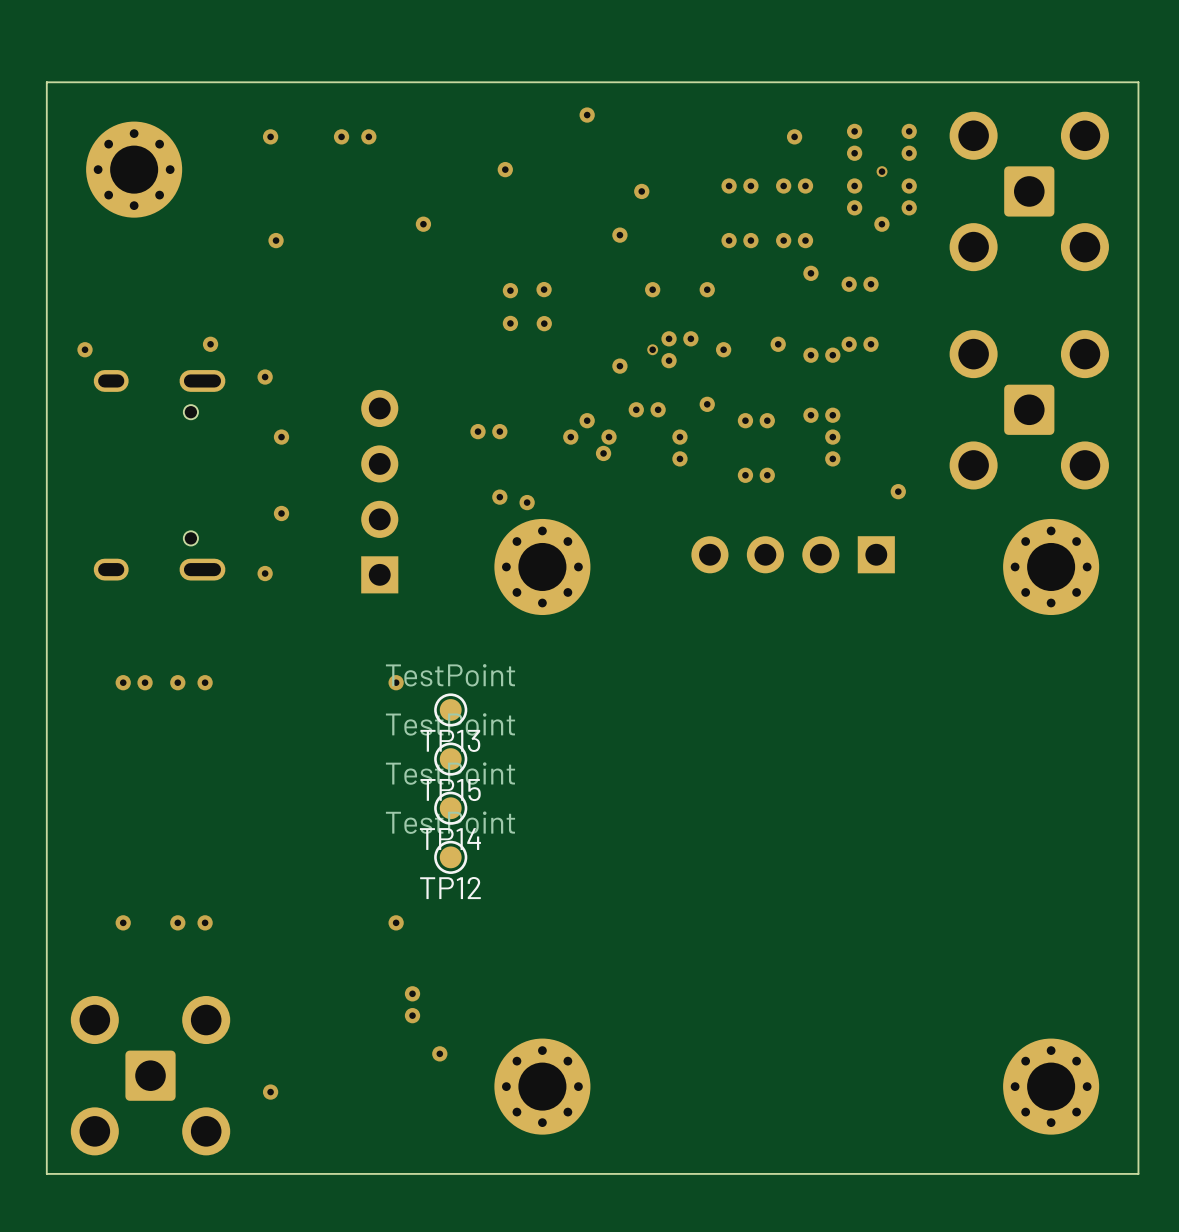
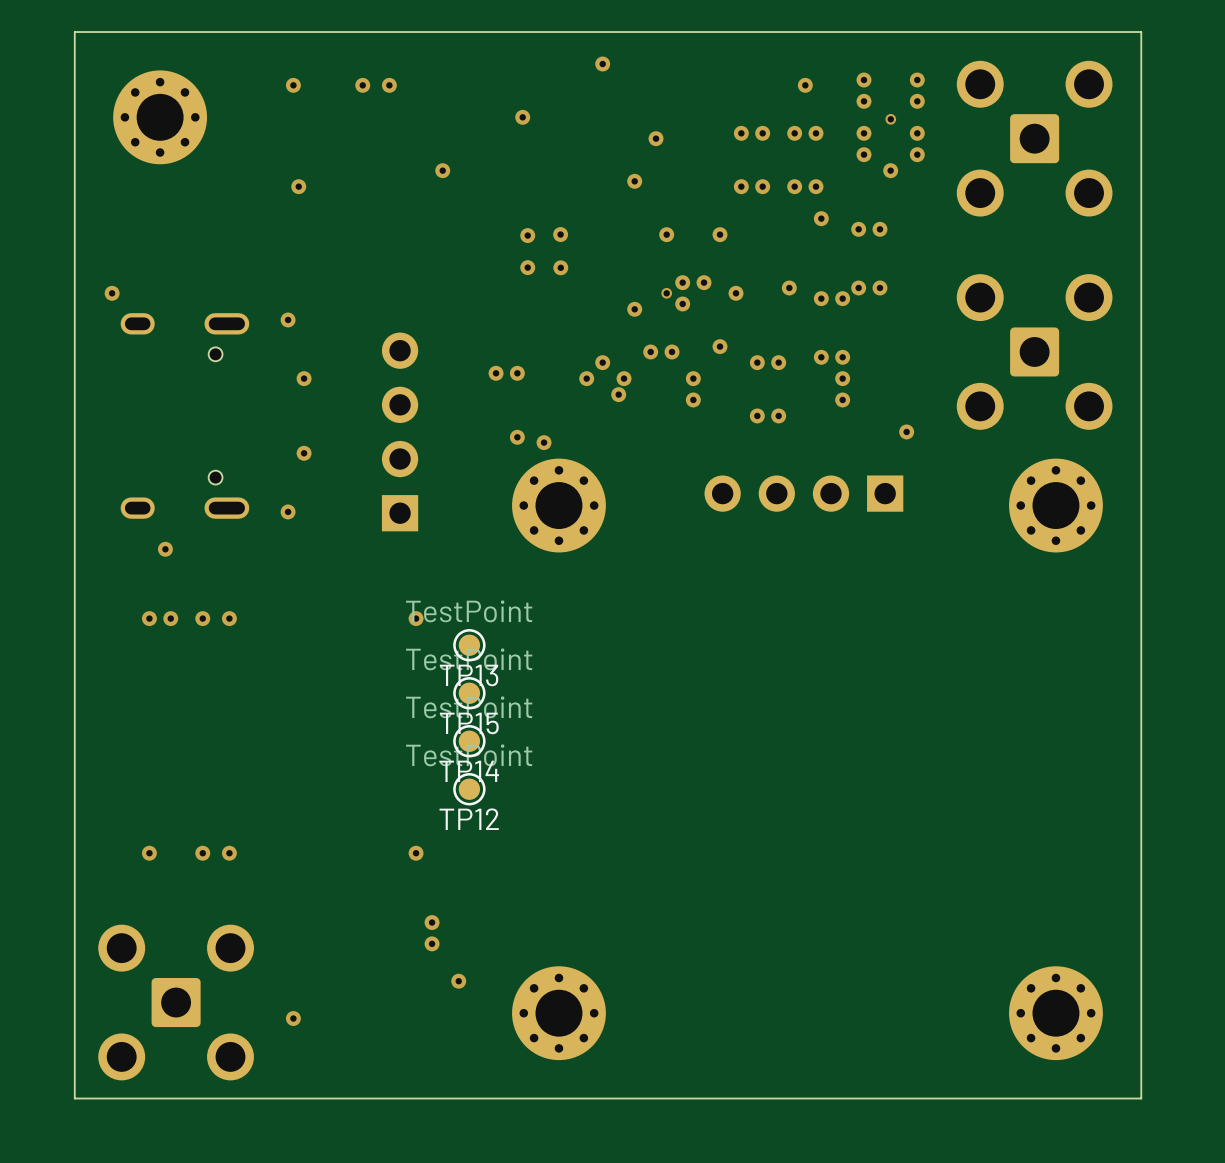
via: (210, 344) -> none
via: none -> (165, 549)

